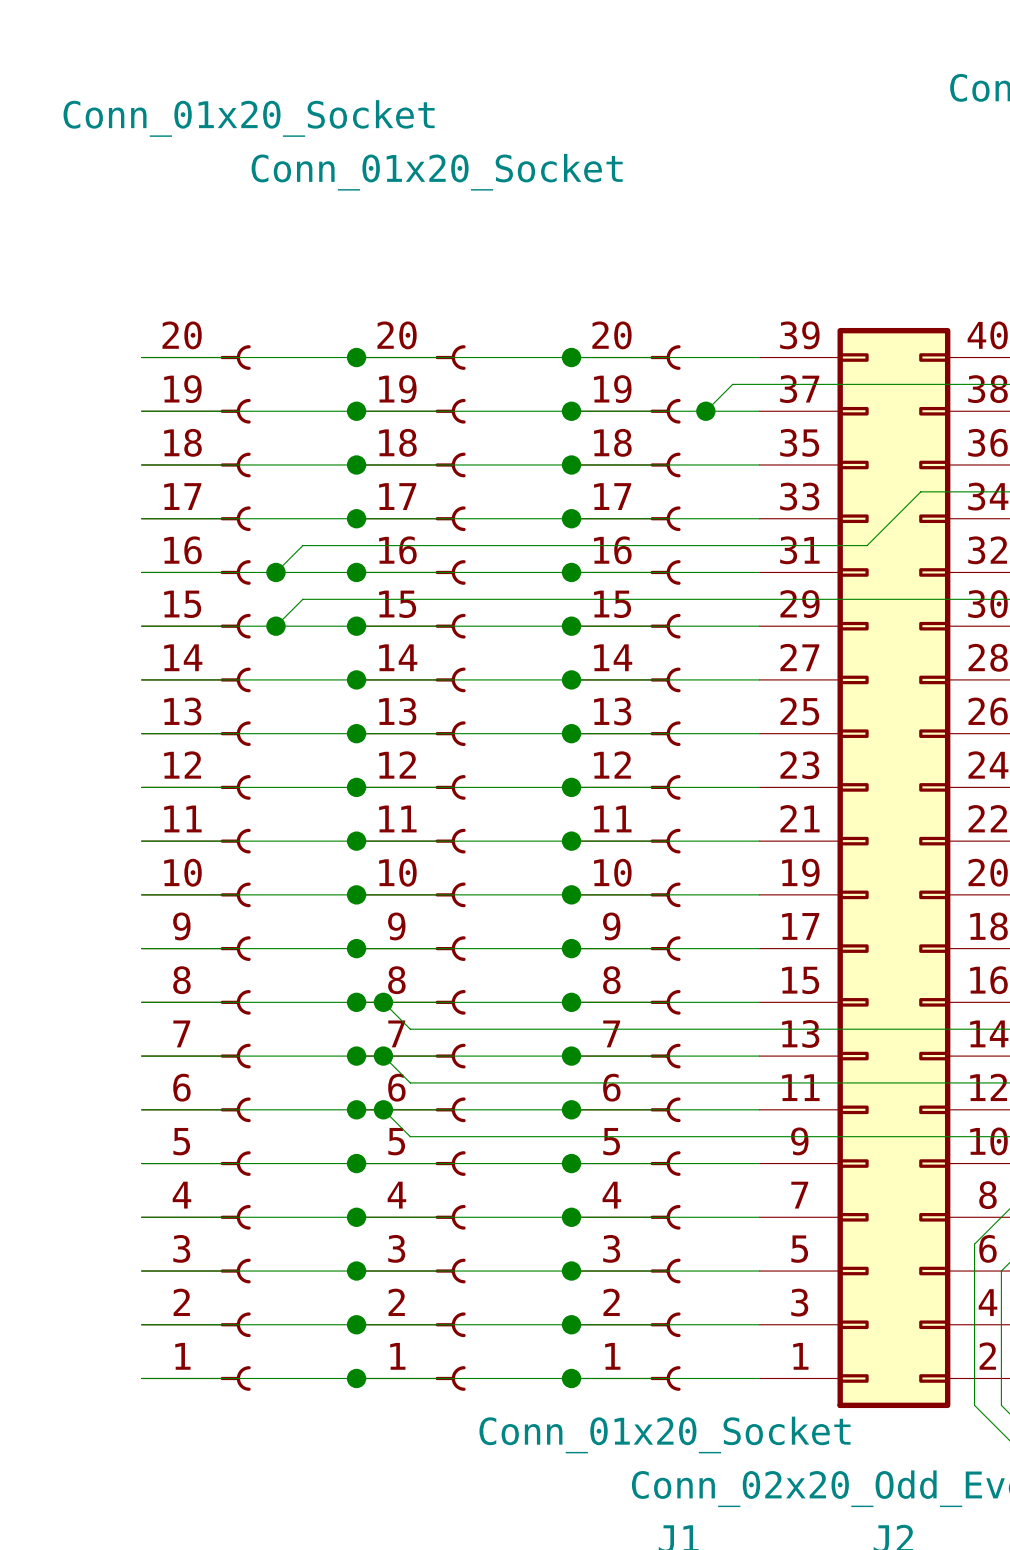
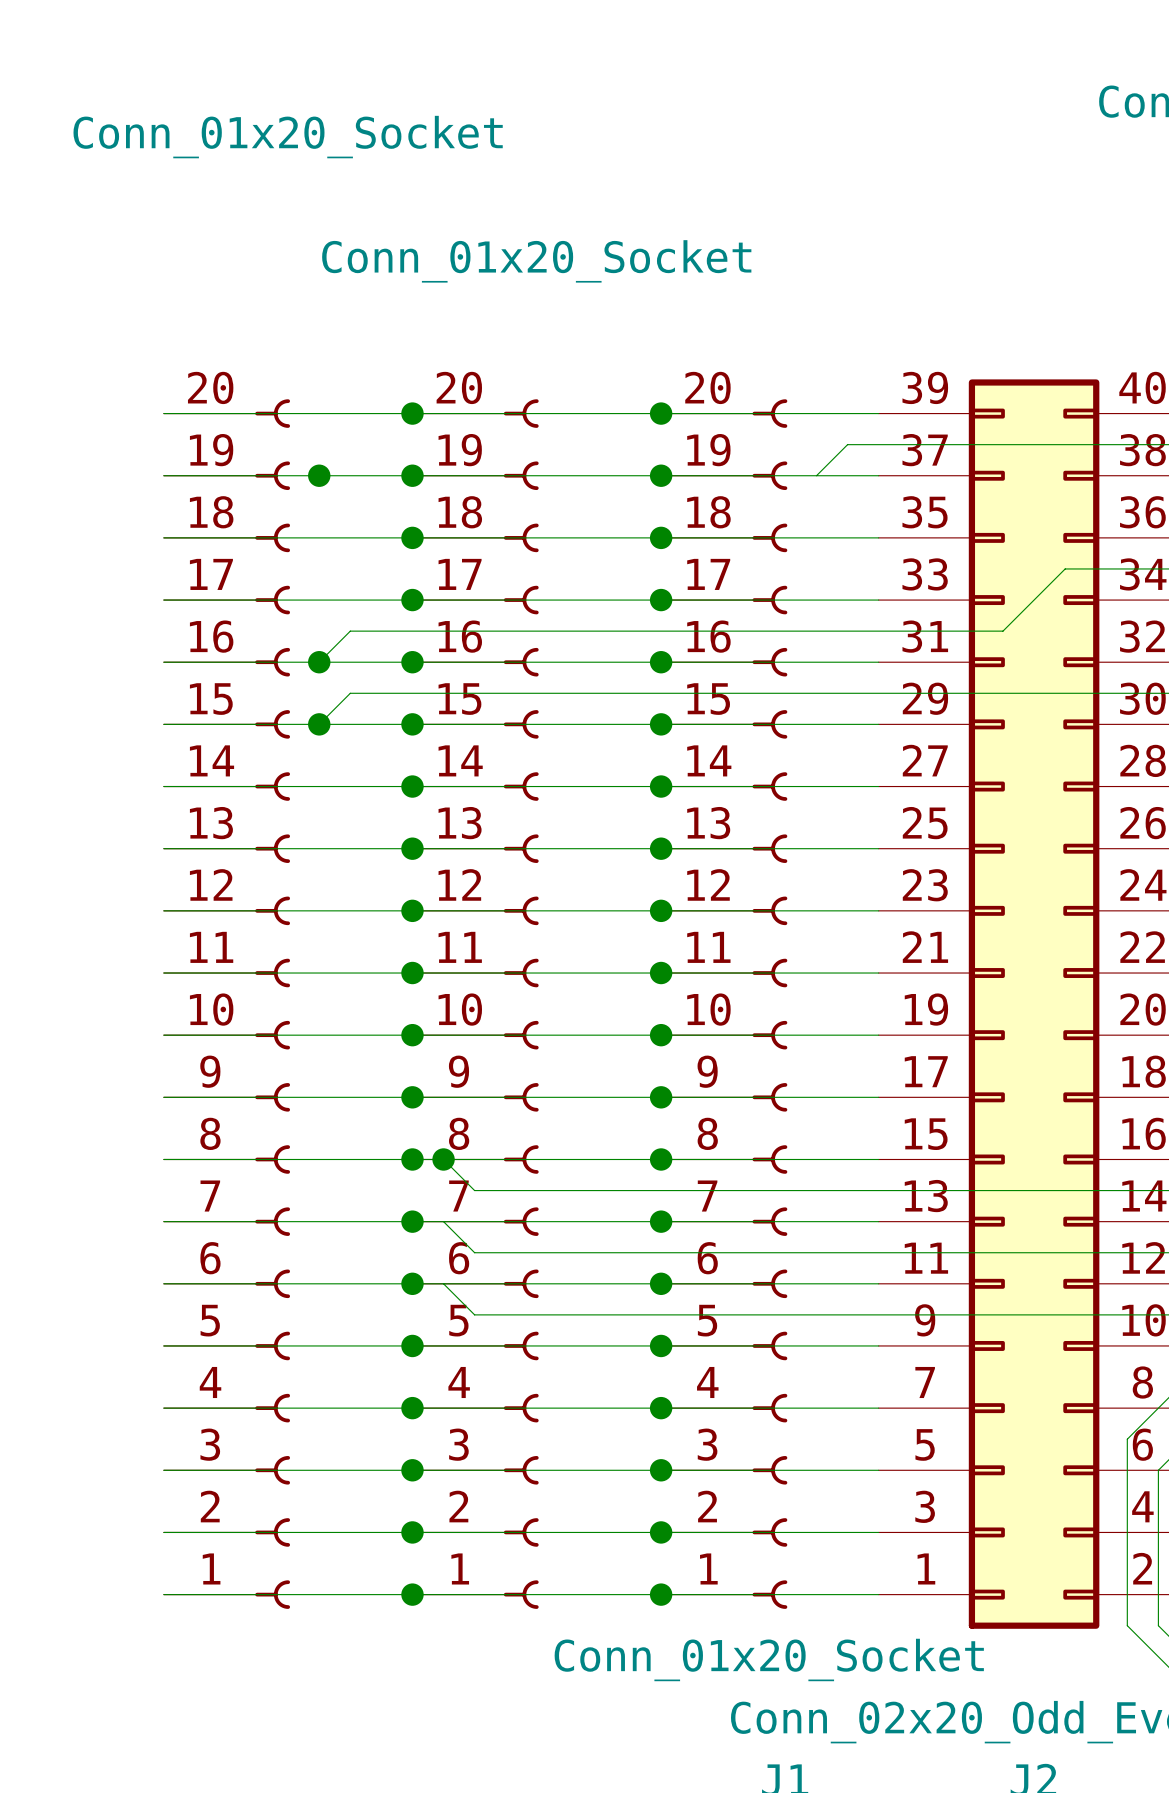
part value position: Conn_01x20_Socket (437, 172) -> Conn_01x20_Socket (536, 261)
junction: none -> (319, 475)
junction: (705, 411) -> none
junction: (383, 1056) -> none
junction: (383, 1109) -> none

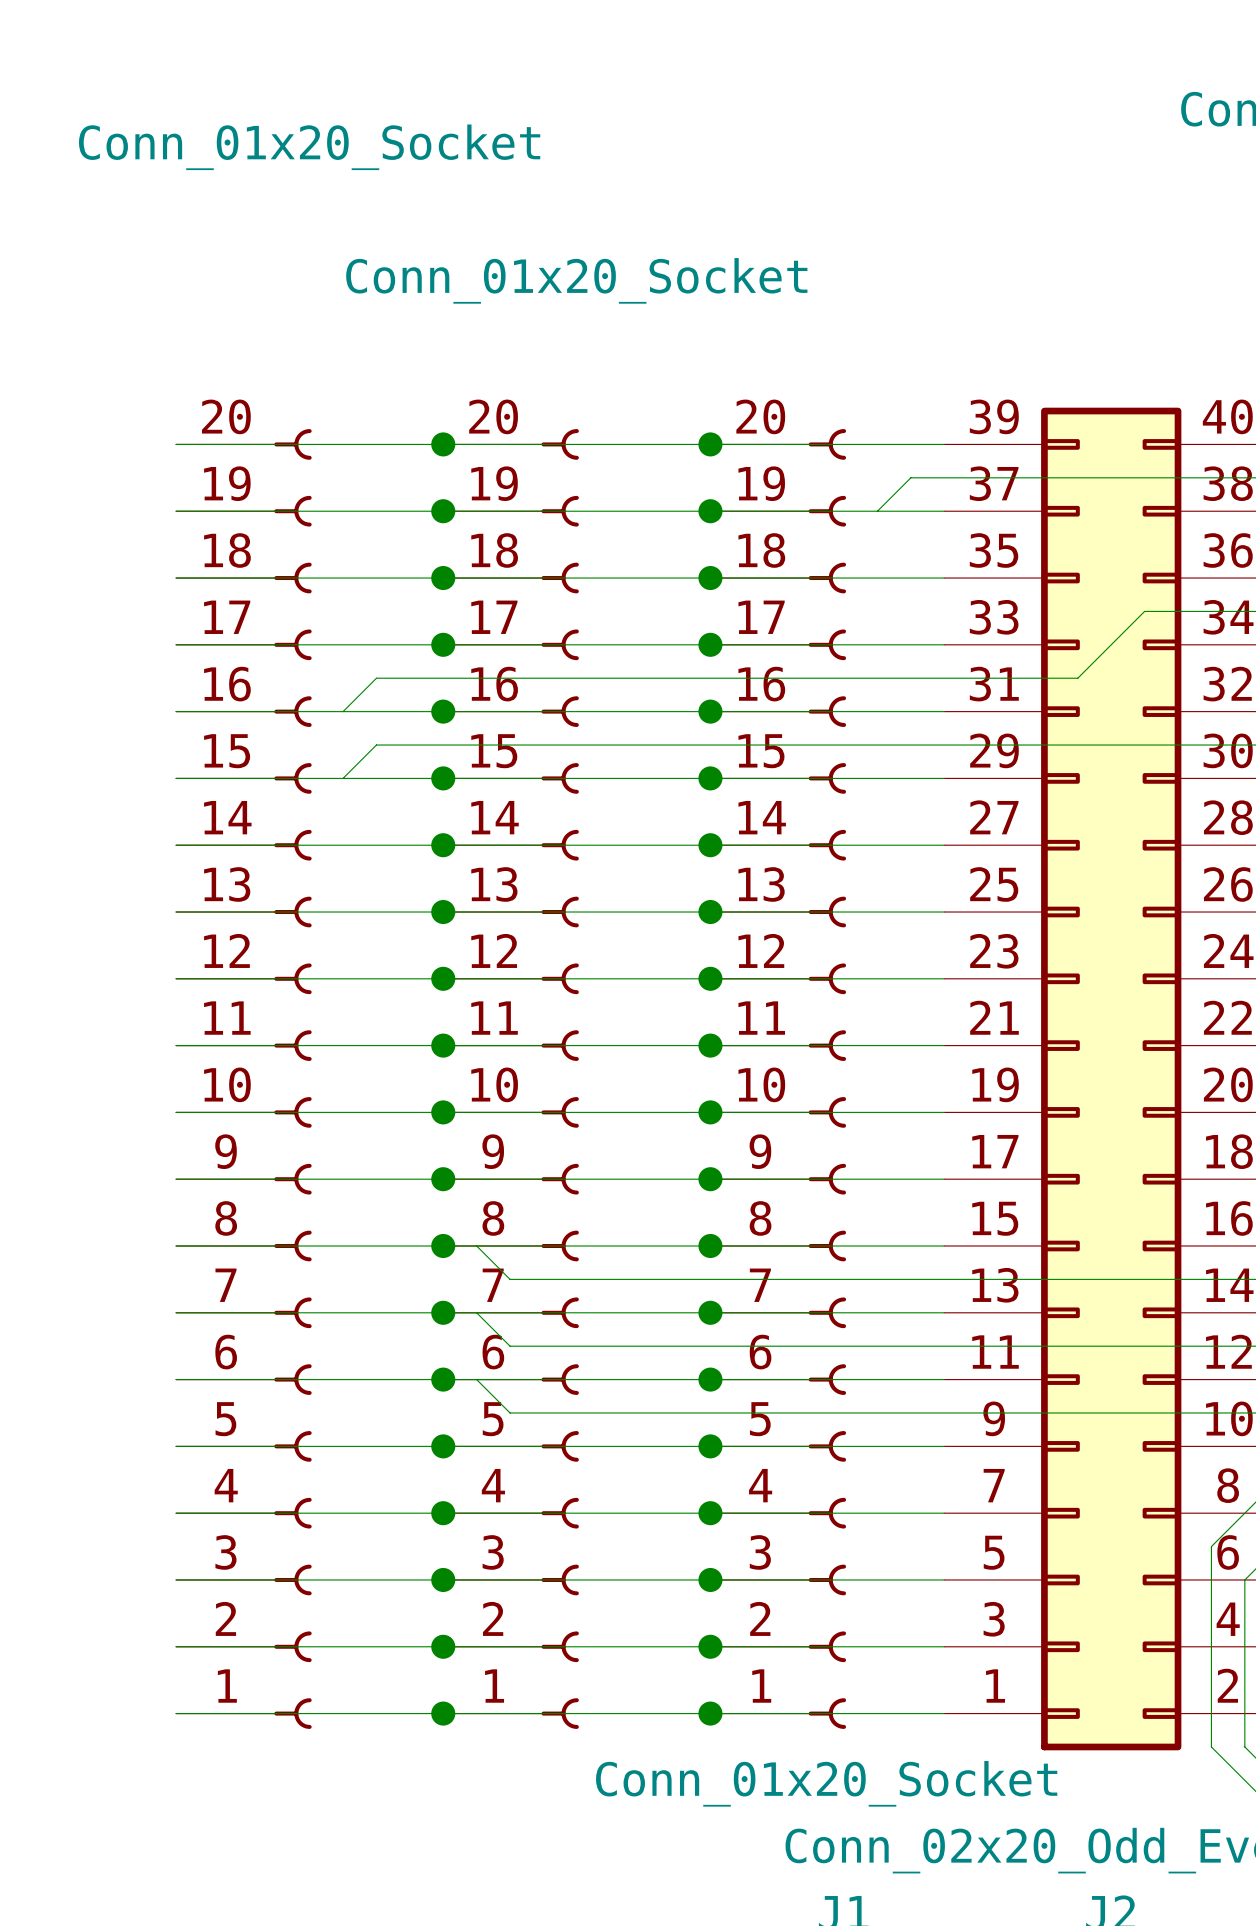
junction: (319, 475) -> none
junction: (319, 662) -> none
junction: (319, 724) -> none
junction: (443, 1159) -> none

